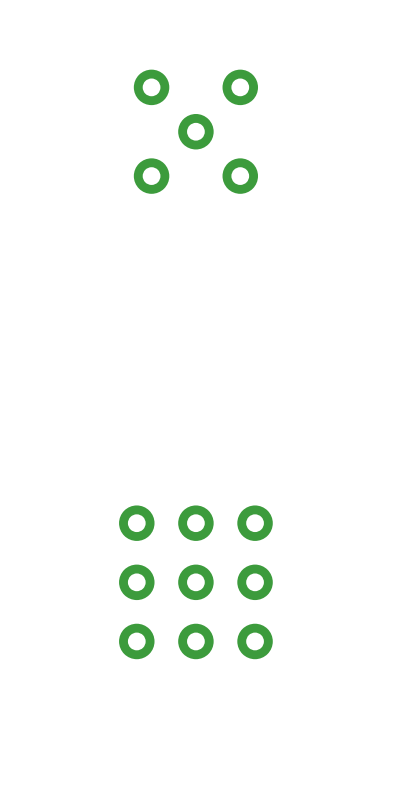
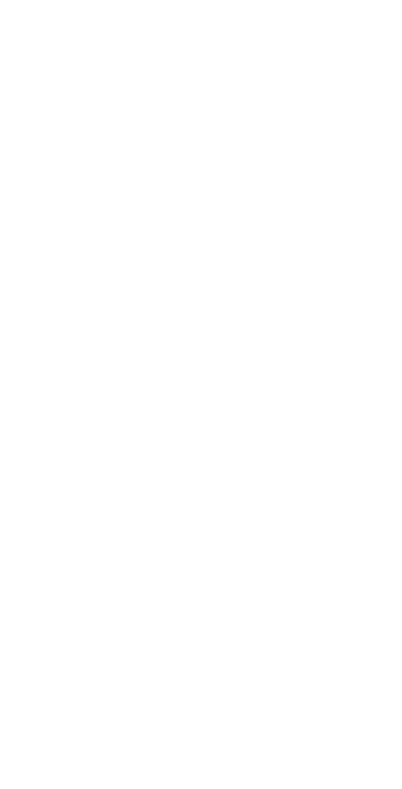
part: (195, 131) -> none
part: (195, 582) -> none

